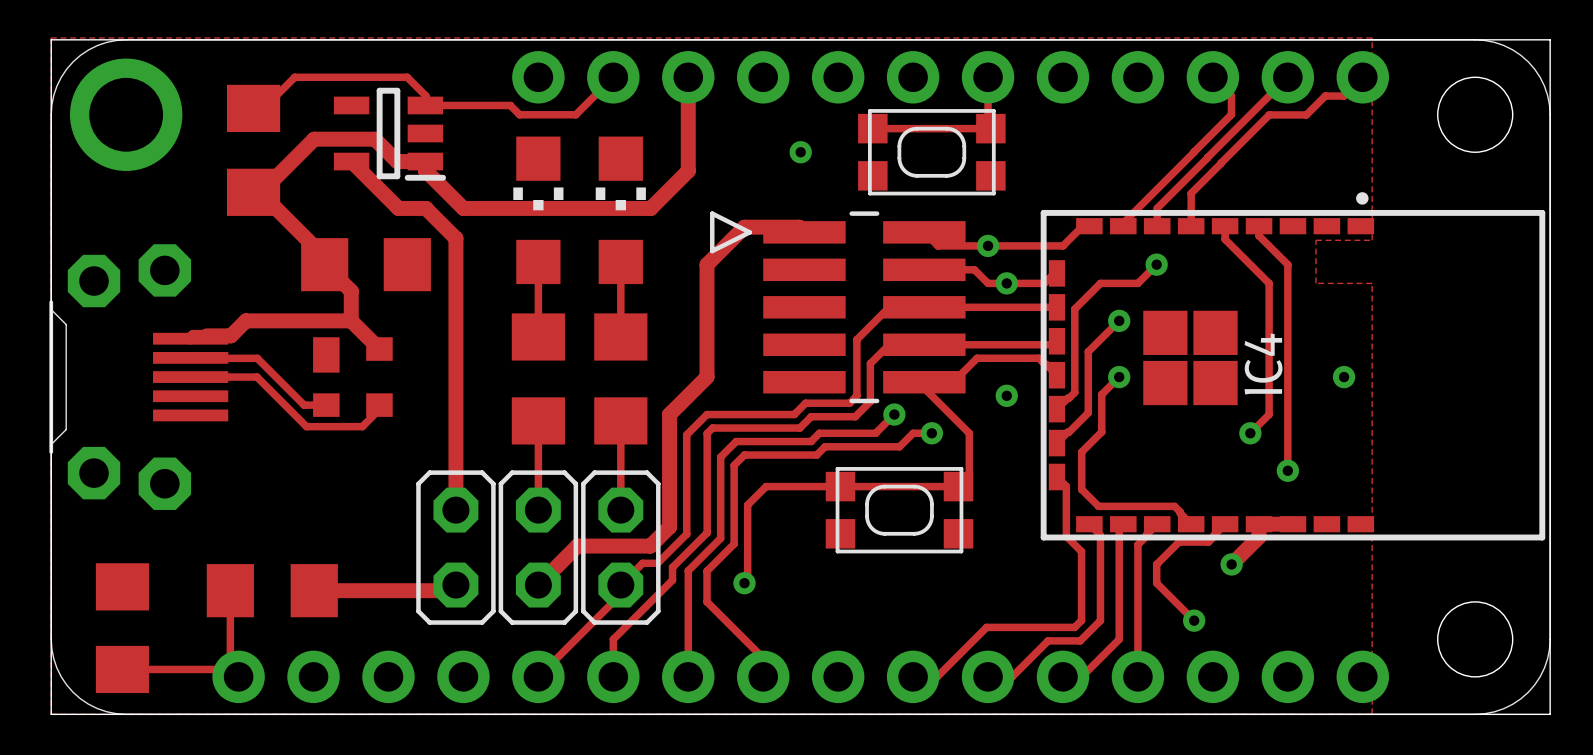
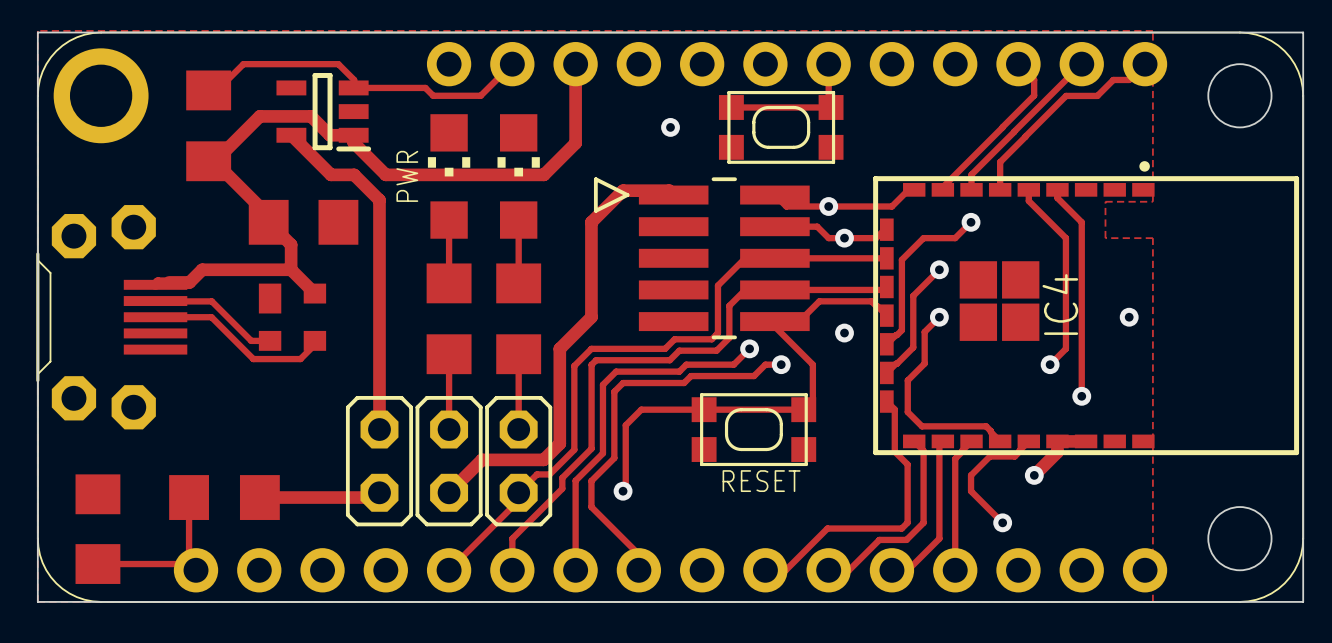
text: none -> PWR (407, 176)
text: none -> RESET (761, 481)

